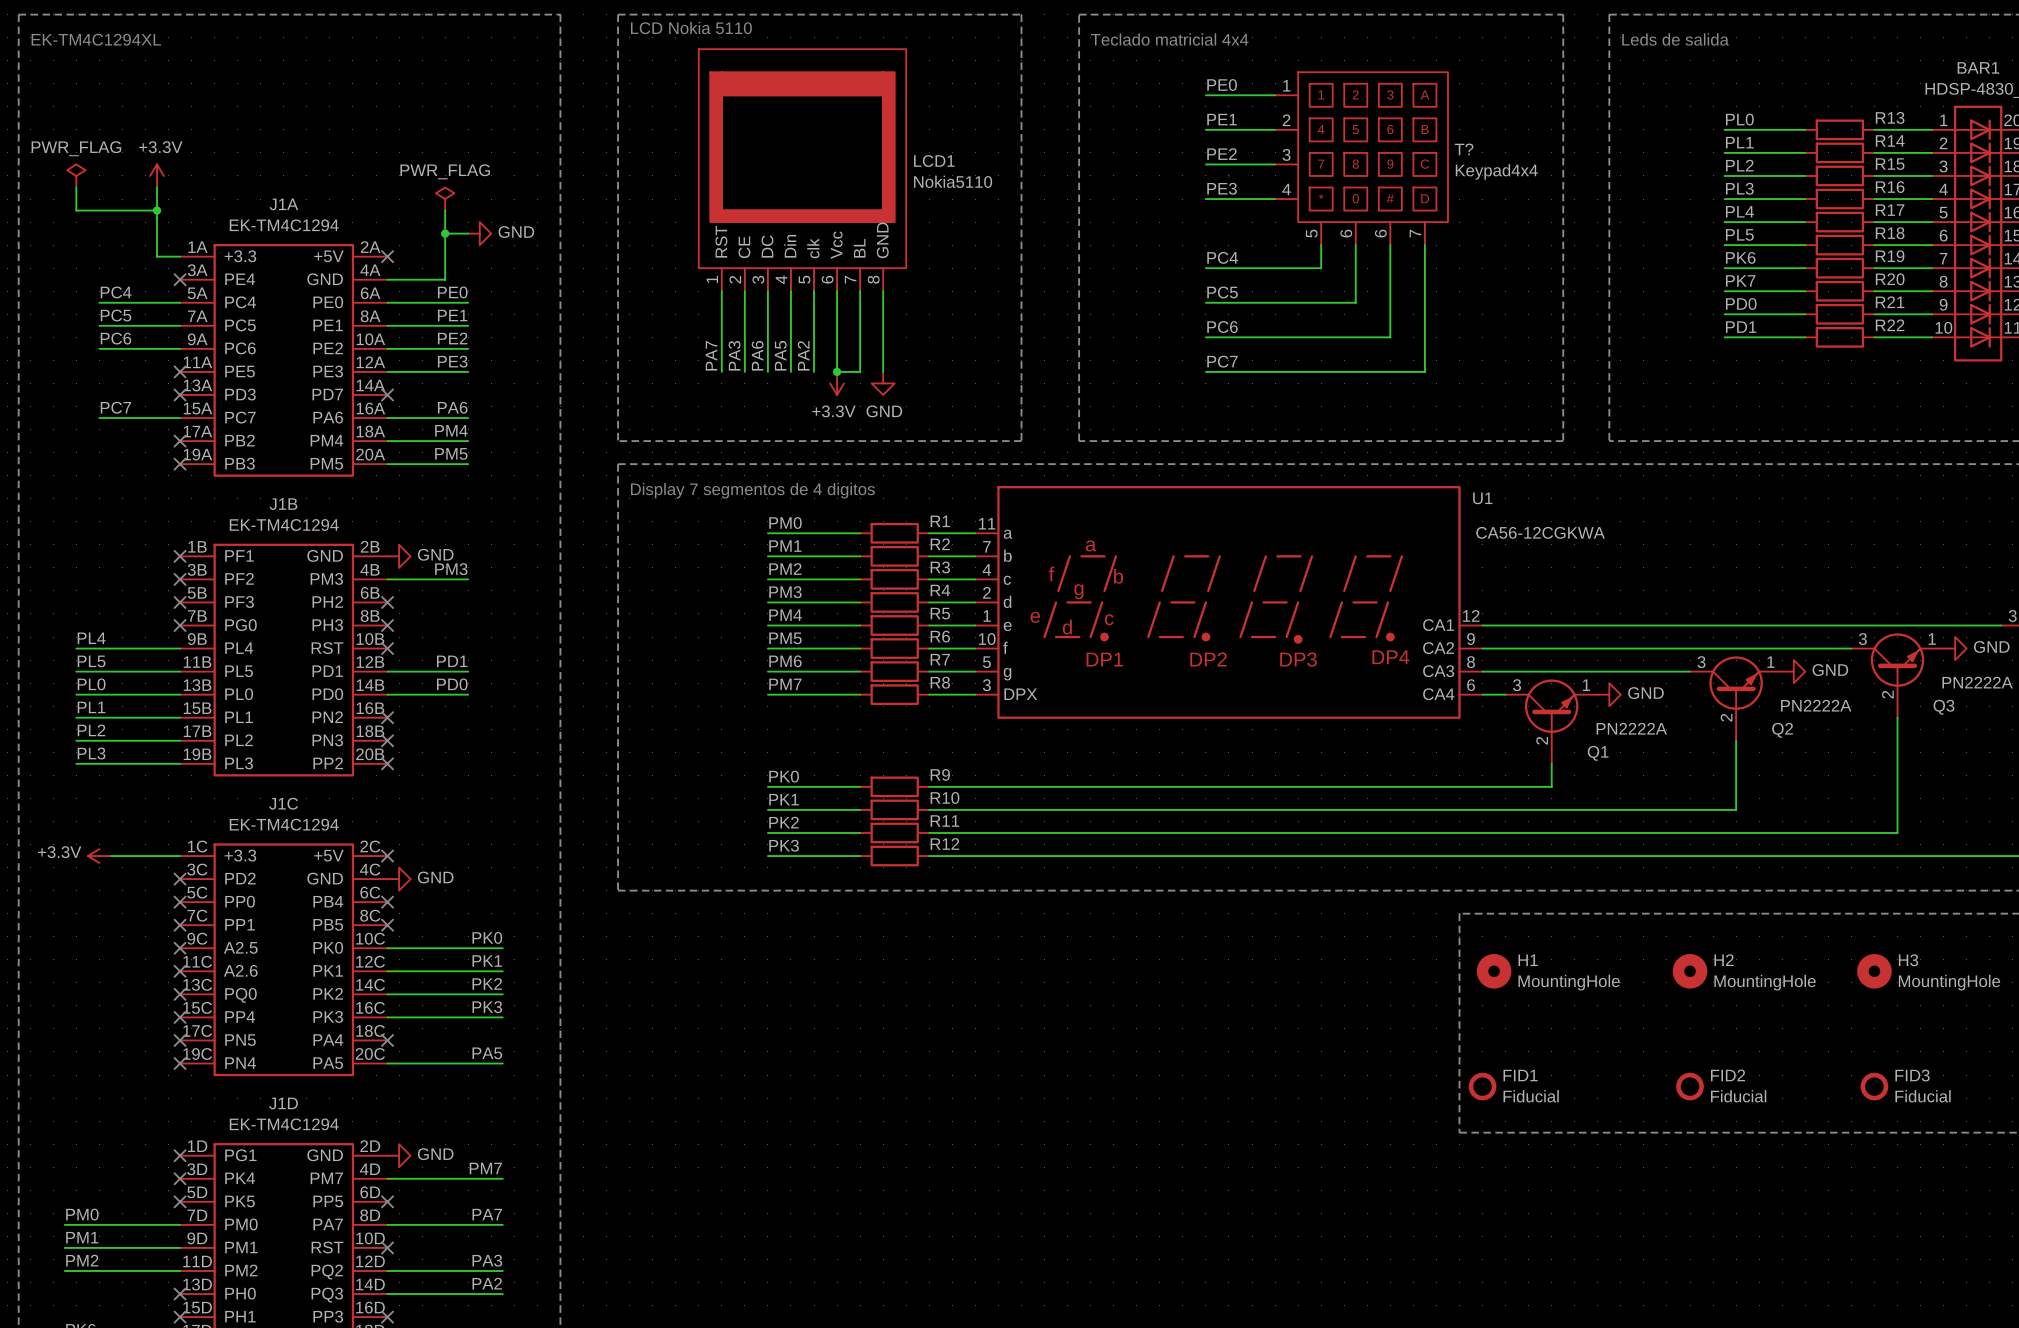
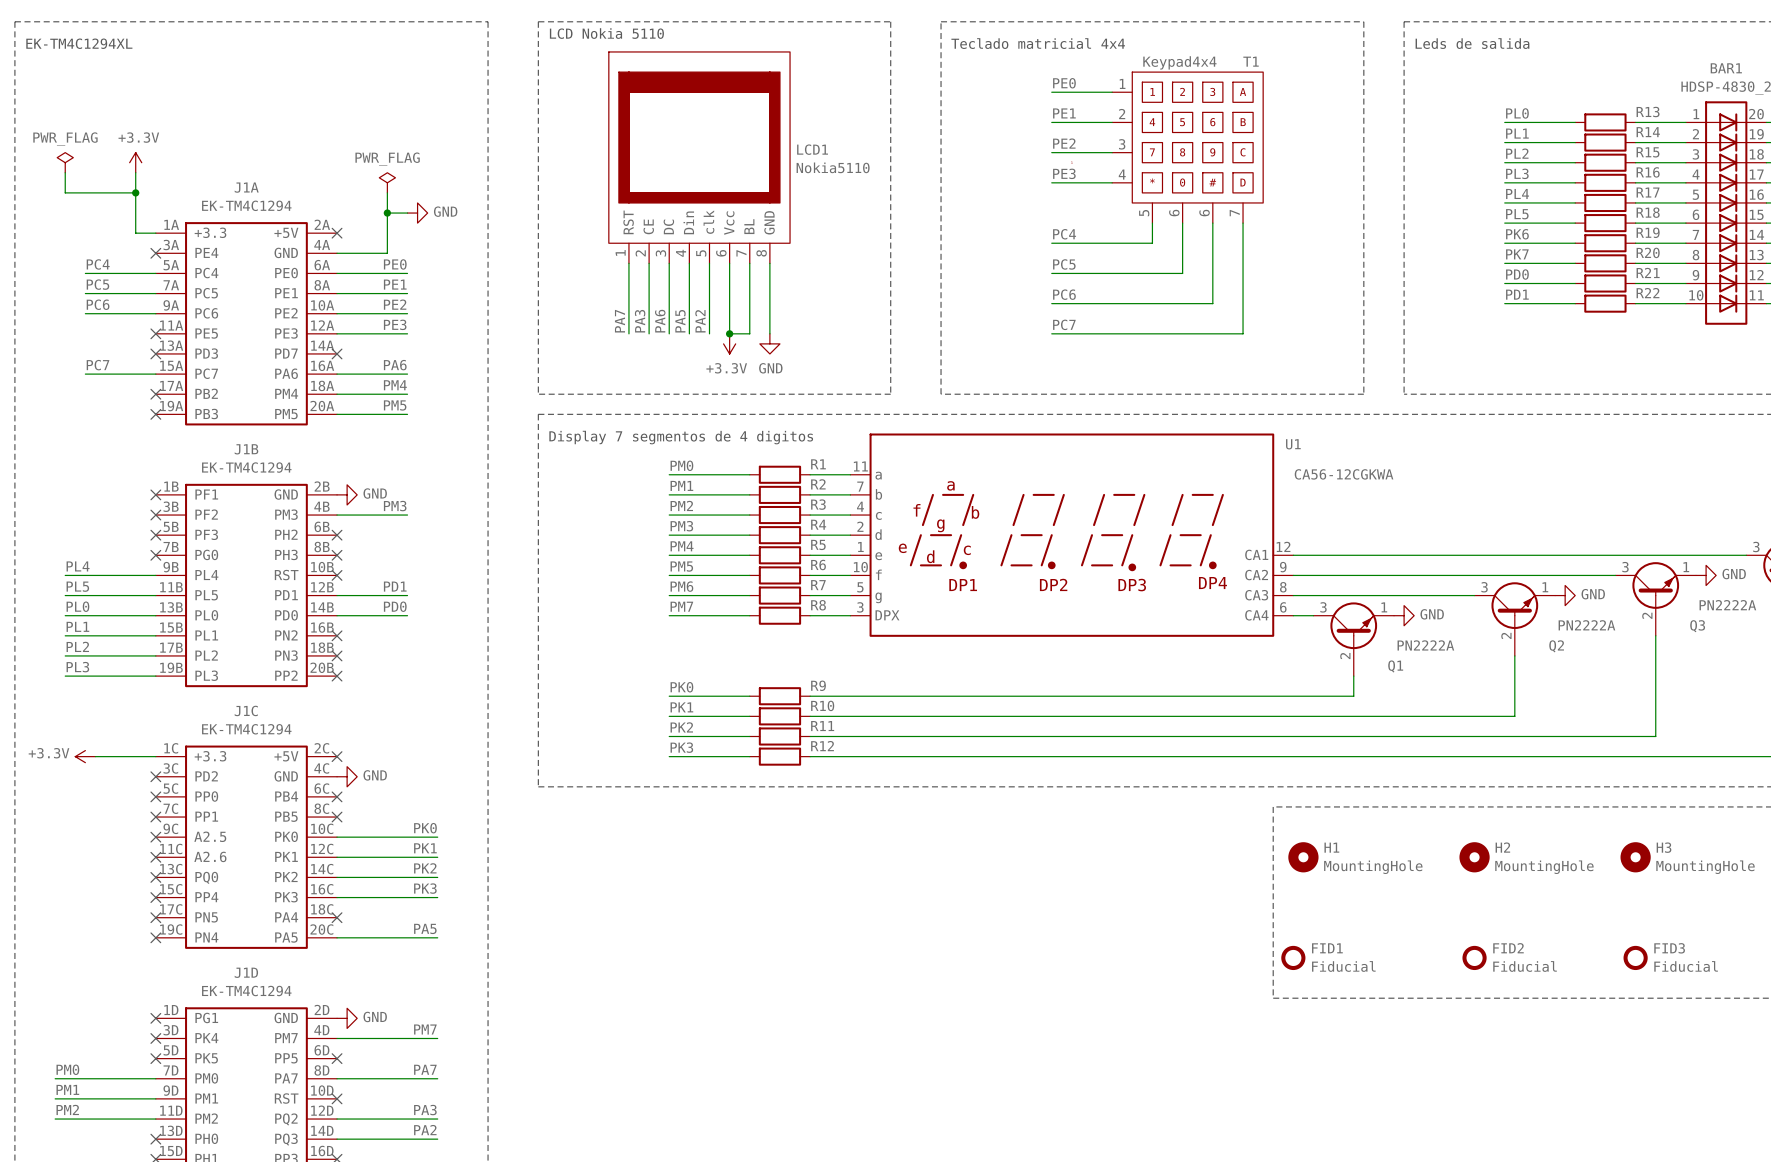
T? name: T? (1464, 149) -> T1 (1251, 61)
T? value position: Keypad4x4 (1496, 171) -> Keypad4x4 (1179, 62)

